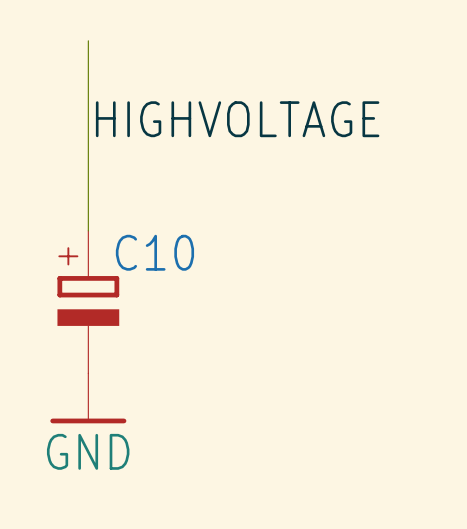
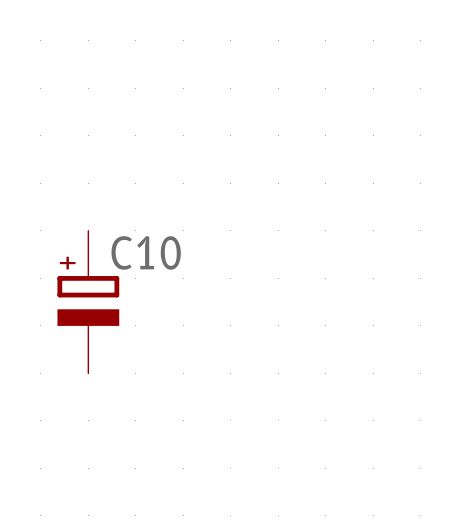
wire: (88, 40) (88, 230) -> none
label: HIGHVOLTAGE (237, 119) -> none
power symbol: GND (88, 398) -> none

